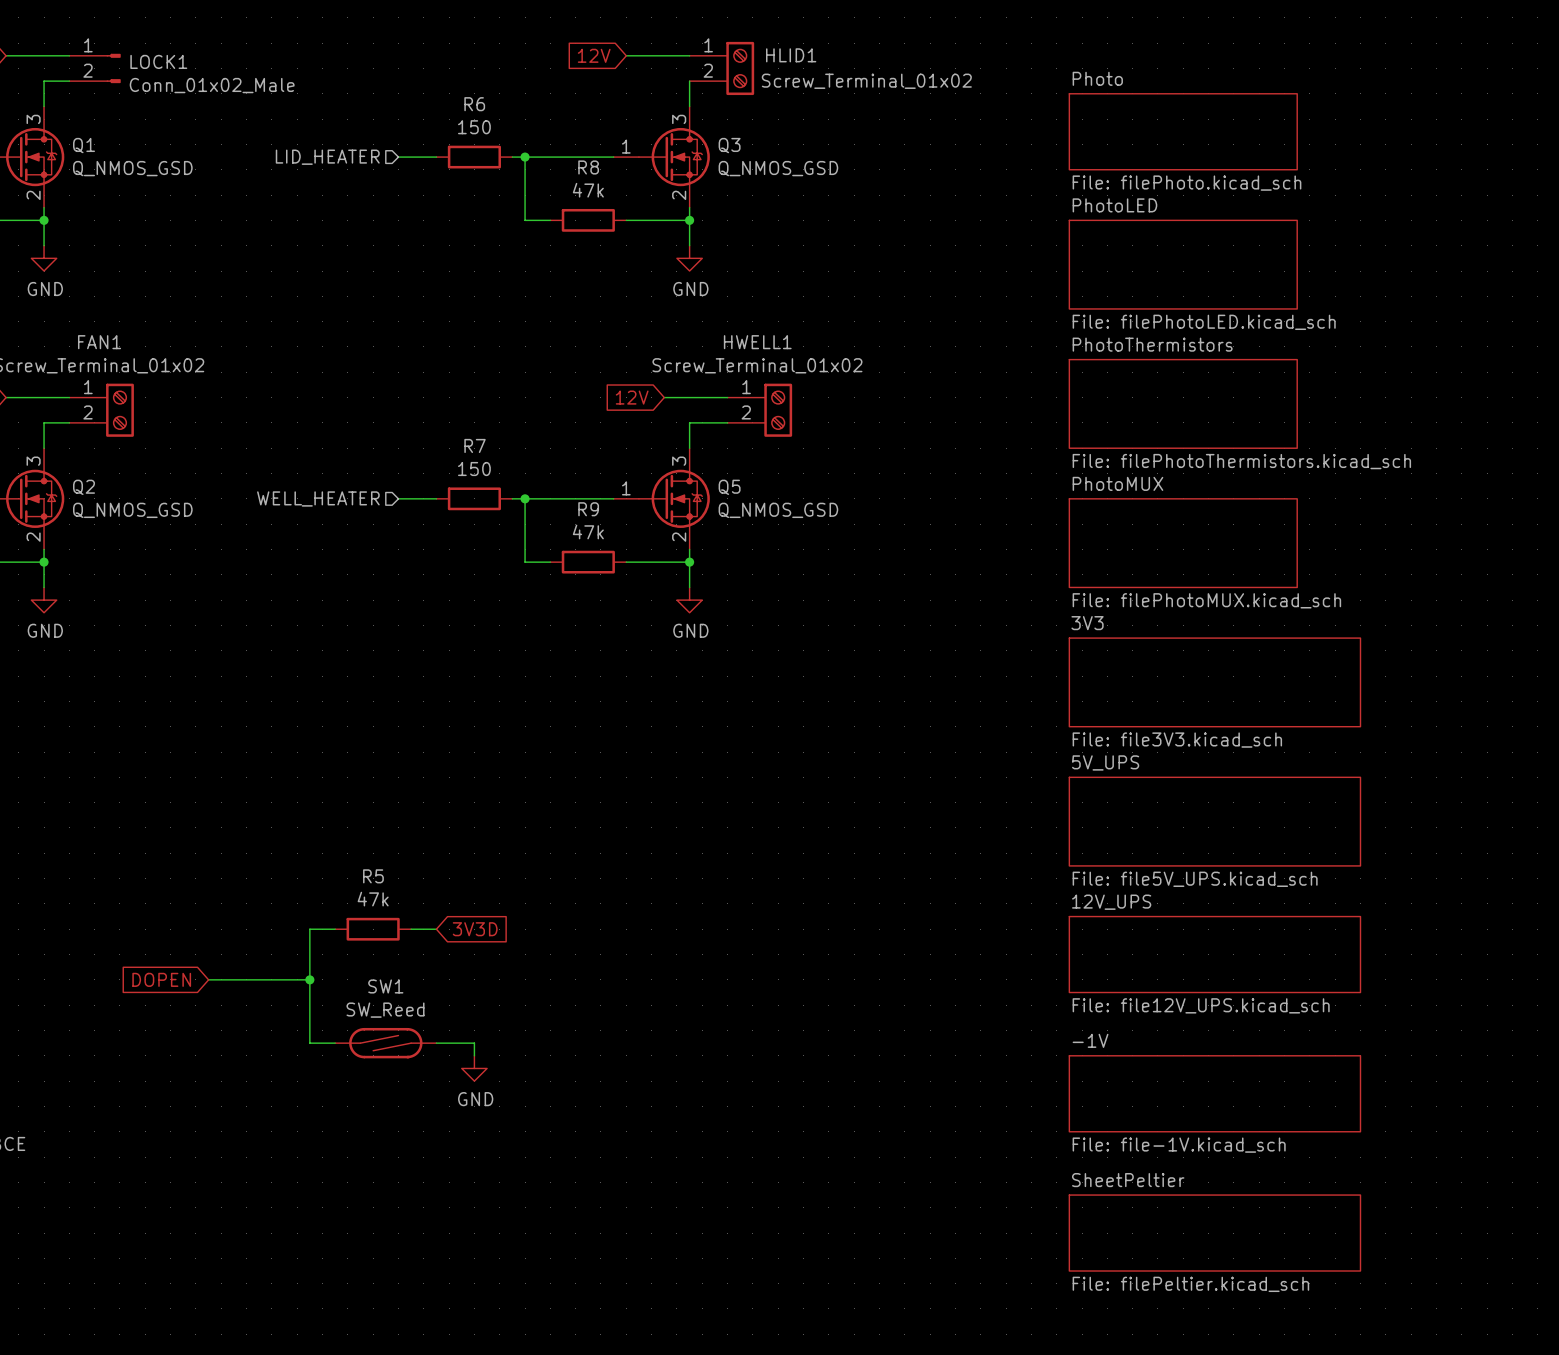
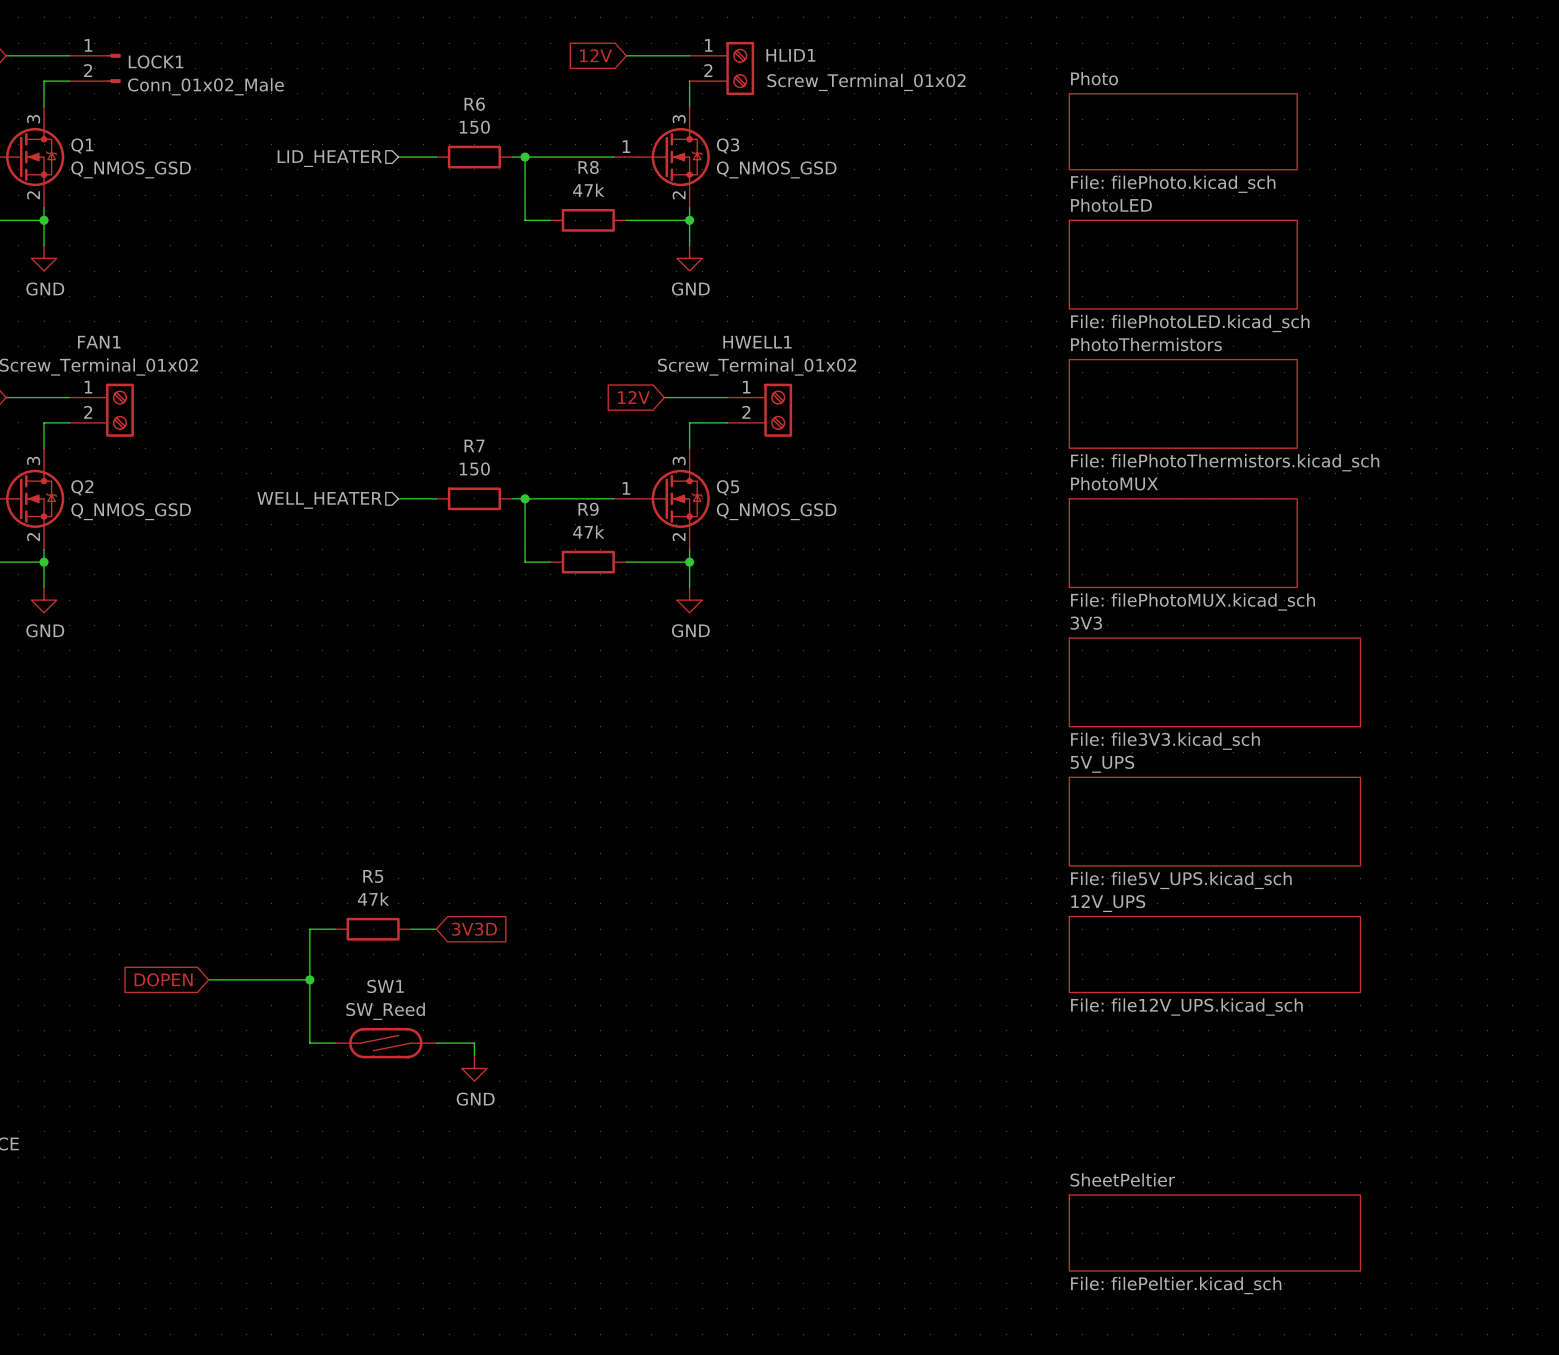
sheet -1V: File: file-1V.kicad_sch (1214, 1093) -> none

